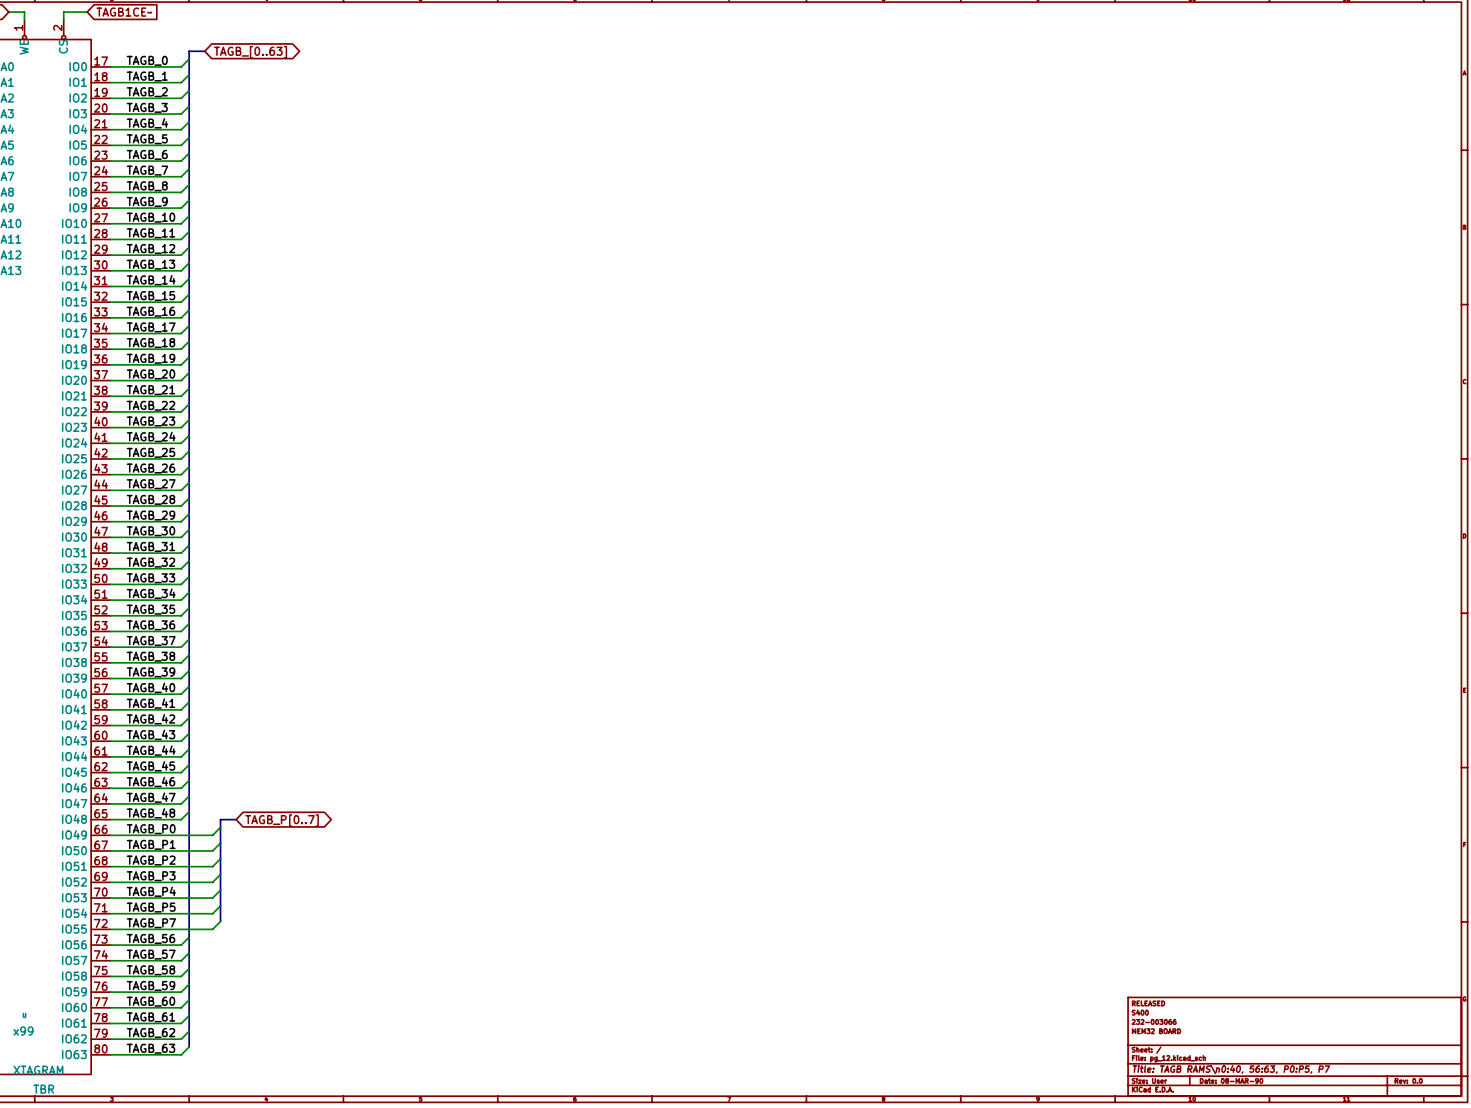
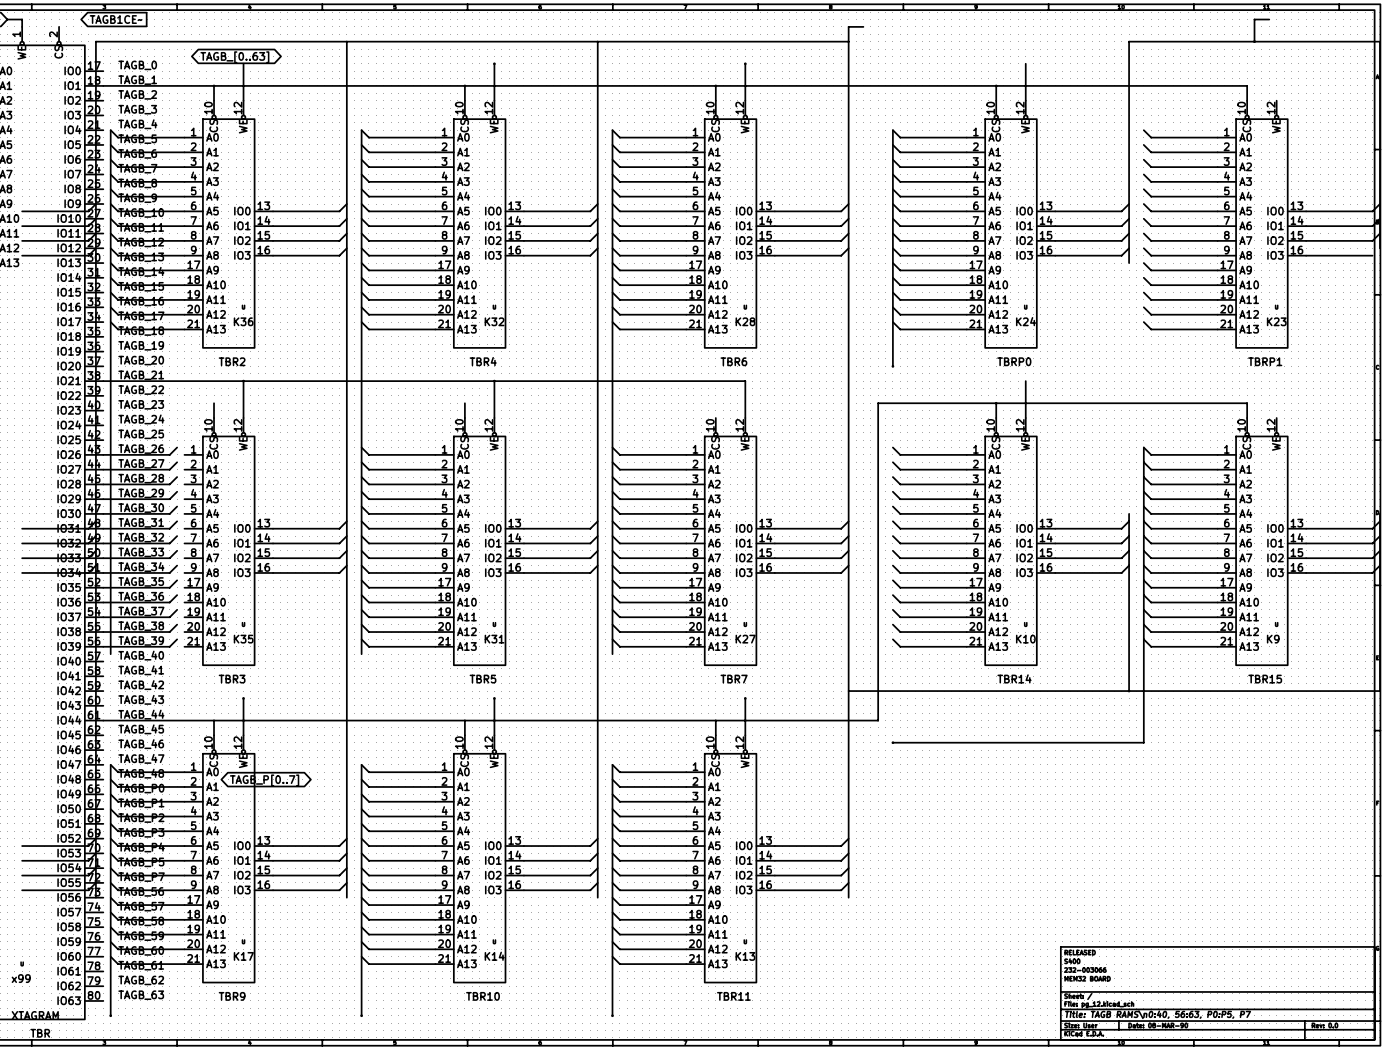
wire: (87, 12) (63, 12) (63, 19) -> none
bus: none -> (1269, 19) (1254, 19) (1254, 41)
bus: none -> (863, 26) (848, 26) (848, 897)
bus: none -> (346, 41) (346, 897)
bus: none -> (597, 41) (597, 897)
bus: none -> (848, 41) (95, 41) (95, 897)
bus: (204, 51) (189, 51) (189, 1047) -> none
wire: (189, 59) (181, 66) (110, 66) -> none
wire: none -> (243, 63) (243, 100)
wire: none -> (494, 63) (494, 100)
junction: none -> (494, 63)
wire: none -> (745, 63) (745, 100)
junction: none -> (745, 63)
wire: none -> (1025, 63) (1025, 100)
wire: (189, 74) (181, 82) -> (1247, 100) (1247, 85) (169, 85)
wire: none -> (214, 85) (214, 100)
wire: none -> (464, 85) (464, 100)
wire: none -> (715, 85) (715, 100)
wire: none -> (996, 85) (996, 100)
wire: (189, 90) (181, 98) (110, 98) -> none
wire: (189, 106) (181, 114) (110, 114) -> none
wire: (189, 121) (181, 129) (110, 129) -> none
wire: none -> (110, 130) (118, 137) (184, 137)
bus: none -> (110, 130) (110, 654)
wire: none -> (361, 130) (368, 137) (435, 137)
bus: none -> (361, 130) (361, 654)
wire: none -> (612, 130) (619, 137) (686, 137)
bus: none -> (612, 130) (612, 654)
wire: none -> (892, 130) (900, 137) (966, 137)
bus: none -> (892, 130) (892, 366)
wire: none -> (1143, 130) (1151, 137) (1217, 137)
wire: (189, 137) (181, 145) (110, 145) -> none
wire: none -> (110, 144) (118, 152) (184, 152)
wire: none -> (361, 144) (368, 152) (435, 152)
wire: none -> (612, 144) (619, 152) (686, 152)
wire: none -> (892, 144) (900, 152) (966, 152)
wire: none -> (1143, 144) (1151, 152) (1217, 152)
wire: (189, 153) (181, 161) (110, 161) -> none
wire: none -> (110, 159) (118, 167) (184, 167)
wire: none -> (361, 159) (368, 167) (435, 167)
wire: none -> (612, 159) (619, 167) (686, 167)
wire: none -> (892, 159) (900, 167) (966, 167)
wire: none -> (1143, 159) (1151, 167) (1217, 167)
wire: (189, 168) (181, 176) (110, 176) -> none
wire: none -> (110, 174) (118, 181) (184, 181)
wire: none -> (361, 174) (368, 181) (435, 181)
wire: none -> (612, 174) (619, 181) (686, 181)
wire: none -> (892, 174) (900, 181) (966, 181)
wire: none -> (1143, 174) (1151, 181) (1217, 181)
wire: (189, 184) (181, 192) (110, 192) -> none
wire: none -> (110, 189) (118, 196) (184, 196)
wire: none -> (361, 189) (368, 196) (435, 196)
wire: none -> (612, 189) (619, 196) (686, 196)
wire: none -> (892, 189) (900, 196) (966, 196)
wire: none -> (1143, 189) (1151, 196) (1217, 196)
wire: (189, 200) (181, 208) (110, 208) -> none
wire: none -> (95, 204) (88, 211) (22, 211)
wire: none -> (110, 204) (118, 211) (184, 211)
wire: none -> (346, 204) (339, 211) (273, 211)
wire: none -> (361, 204) (368, 211) (435, 211)
wire: none -> (597, 204) (590, 211) (523, 211)
wire: none -> (612, 204) (619, 211) (686, 211)
wire: none -> (848, 204) (841, 211) (774, 211)
wire: none -> (892, 204) (900, 211) (966, 211)
wire: none -> (1129, 204) (1121, 211) (1055, 211)
wire: none -> (1143, 204) (1151, 211) (1217, 211)
wire: none -> (1379, 204) (1372, 211) (1306, 211)
wire: (189, 215) (181, 223) (110, 223) -> none
wire: none -> (95, 218) (88, 226) (22, 226)
wire: none -> (110, 218) (118, 226) (184, 226)
wire: none -> (346, 218) (339, 226) (273, 226)
wire: none -> (361, 218) (368, 226) (435, 226)
wire: none -> (597, 218) (590, 226) (523, 226)
wire: none -> (612, 218) (619, 226) (686, 226)
wire: none -> (848, 218) (841, 226) (774, 226)
wire: none -> (892, 218) (900, 226) (966, 226)
wire: none -> (1129, 218) (1121, 226) (1055, 226)
wire: none -> (1143, 218) (1151, 226) (1217, 226)
wire: none -> (1379, 218) (1372, 226) (1306, 226)
part: none -> (228, 224)
part: none -> (479, 224)
part: none -> (730, 224)
part: none -> (1010, 224)
part: none -> (1261, 224)
wire: (189, 231) (181, 239) (110, 239) -> none
wire: none -> (95, 233) (88, 240) (22, 240)
wire: none -> (110, 233) (118, 240) (184, 240)
wire: none -> (346, 233) (339, 240) (273, 240)
wire: none -> (361, 233) (368, 240) (435, 240)
wire: none -> (597, 233) (590, 240) (523, 240)
wire: none -> (612, 233) (619, 240) (686, 240)
wire: none -> (848, 233) (841, 240) (774, 240)
wire: none -> (892, 233) (900, 240) (966, 240)
wire: none -> (1129, 233) (1121, 240) (1055, 240)
wire: none -> (1143, 233) (1151, 240) (1217, 240)
wire: none -> (1379, 233) (1372, 240) (1306, 240)
wire: (189, 247) (181, 255) (110, 255) -> none
wire: none -> (95, 248) (88, 255) (22, 255)
wire: none -> (110, 248) (118, 255) (184, 255)
wire: none -> (346, 248) (339, 255) (273, 255)
wire: none -> (361, 248) (368, 255) (435, 255)
wire: none -> (597, 248) (590, 255) (523, 255)
wire: none -> (612, 248) (619, 255) (686, 255)
wire: none -> (848, 248) (841, 255) (774, 255)
wire: none -> (892, 248) (900, 255) (966, 255)
wire: none -> (1129, 248) (1121, 255) (1055, 255)
wire: none -> (1143, 248) (1151, 255) (1217, 255)
bus: none -> (1379, 248) (1379, 41) (1129, 41) (1129, 263)
wire: (189, 262) (181, 270) (110, 270) -> none
wire: none -> (1306, 255) (1372, 255)
wire: none -> (110, 263) (118, 270) (184, 270)
wire: none -> (361, 263) (368, 270) (435, 270)
wire: none -> (612, 263) (619, 270) (686, 270)
wire: none -> (892, 263) (900, 270) (966, 270)
wire: none -> (1143, 263) (1151, 270) (1217, 270)
wire: (189, 278) (181, 286) (110, 286) -> none
wire: none -> (110, 277) (118, 285) (184, 285)
wire: none -> (361, 277) (368, 285) (435, 285)
wire: none -> (612, 277) (619, 285) (686, 285)
wire: none -> (892, 277) (900, 285) (966, 285)
wire: none -> (1143, 277) (1151, 285) (1217, 285)
wire: (189, 294) (181, 302) (110, 302) -> none
wire: none -> (110, 292) (118, 299) (184, 299)
wire: none -> (361, 292) (368, 299) (435, 299)
wire: none -> (612, 292) (619, 299) (686, 299)
wire: none -> (892, 292) (900, 299) (966, 299)
wire: none -> (1143, 292) (1151, 299) (1217, 299)
wire: (189, 310) (181, 317) (110, 317) -> none
wire: none -> (110, 307) (118, 314) (184, 314)
wire: none -> (361, 307) (368, 314) (435, 314)
wire: none -> (612, 307) (619, 314) (686, 314)
wire: none -> (892, 307) (900, 314) (966, 314)
wire: none -> (1143, 307) (1151, 314) (1217, 314)
wire: (189, 325) (181, 333) (110, 333) -> none
wire: none -> (110, 322) (118, 329) (184, 329)
wire: none -> (361, 322) (368, 329) (435, 329)
wire: none -> (612, 322) (619, 329) (686, 329)
wire: none -> (892, 322) (900, 329) (966, 329)
wire: none -> (1143, 322) (1151, 329) (1217, 329)
wire: (189, 341) (181, 349) (110, 349) -> none
wire: (189, 357) (181, 364) (110, 364) -> none
wire: (189, 372) (181, 380) (110, 380) -> none
junction: none -> (892, 366)
wire: (189, 388) (181, 396) -> (745, 418) (745, 381) (169, 381)
wire: none -> (243, 381) (243, 418)
wire: none -> (494, 381) (494, 418)
wire: none -> (1025, 381) (1025, 418)
wire: (189, 404) (181, 411) (110, 411) -> none
wire: (189, 419) (181, 427) (110, 427) -> none
wire: none -> (214, 403) (214, 418)
wire: none -> (464, 403) (464, 418)
wire: none -> (996, 403) (996, 418)
wire: (189, 435) (181, 443) (110, 443) -> none
wire: (189, 451) (181, 458) (110, 458) -> none
wire: none -> (361, 447) (368, 454) (435, 454)
wire: none -> (612, 447) (619, 454) (686, 454)
wire: none -> (892, 447) (900, 454) (966, 454)
wire: none -> (1143, 447) (1151, 454) (1217, 454)
bus: none -> (1143, 447) (1143, 742) (892, 742)
wire: none -> (361, 462) (368, 469) (435, 469)
wire: none -> (612, 462) (619, 469) (686, 469)
wire: none -> (892, 462) (900, 469) (966, 469)
wire: none -> (1143, 462) (1151, 469) (1217, 469)
wire: none -> (361, 477) (368, 484) (435, 484)
wire: none -> (612, 477) (619, 484) (686, 484)
wire: none -> (892, 477) (900, 484) (966, 484)
wire: none -> (1143, 477) (1151, 484) (1217, 484)
wire: none -> (361, 491) (368, 499) (435, 499)
wire: none -> (612, 491) (619, 499) (686, 499)
wire: none -> (892, 491) (900, 499) (966, 499)
wire: none -> (1143, 491) (1151, 499) (1217, 499)
wire: none -> (361, 506) (368, 513) (435, 513)
wire: none -> (612, 506) (619, 513) (686, 513)
wire: none -> (892, 506) (900, 513) (966, 513)
wire: none -> (1143, 506) (1151, 513) (1217, 513)
bus: none -> (1129, 513) (1129, 691)
bus: none -> (1379, 513) (1379, 691) (848, 691)
wire: none -> (95, 521) (88, 528) (22, 528)
wire: none -> (346, 521) (339, 528) (273, 528)
wire: none -> (361, 521) (368, 528) (435, 528)
wire: none -> (597, 521) (590, 528) (523, 528)
wire: none -> (612, 521) (619, 528) (686, 528)
wire: none -> (848, 521) (841, 528) (774, 528)
wire: none -> (892, 521) (900, 528) (966, 528)
wire: none -> (1129, 521) (1121, 528) (1055, 528)
wire: none -> (1143, 521) (1151, 528) (1217, 528)
wire: none -> (1379, 521) (1372, 528) (1306, 528)
wire: none -> (95, 536) (88, 543) (22, 543)
wire: none -> (346, 536) (339, 543) (273, 543)
wire: none -> (361, 536) (368, 543) (435, 543)
wire: none -> (597, 536) (590, 543) (523, 543)
wire: none -> (612, 536) (619, 543) (686, 543)
wire: none -> (848, 536) (841, 543) (774, 543)
wire: none -> (892, 536) (900, 543) (966, 543)
wire: none -> (1129, 536) (1121, 543) (1055, 543)
wire: none -> (1143, 536) (1151, 543) (1217, 543)
wire: none -> (1379, 536) (1372, 543) (1306, 543)
part: none -> (228, 541)
part: none -> (479, 541)
part: none -> (730, 541)
part: none -> (1010, 541)
part: none -> (1261, 541)
wire: none -> (95, 550) (88, 558) (22, 558)
wire: none -> (346, 550) (339, 558) (273, 558)
wire: none -> (361, 550) (368, 558) (435, 558)
wire: none -> (597, 550) (590, 558) (523, 558)
wire: none -> (612, 550) (619, 558) (686, 558)
wire: none -> (848, 550) (841, 558) (774, 558)
wire: none -> (892, 550) (900, 558) (966, 558)
wire: none -> (1129, 550) (1121, 558) (1055, 558)
wire: none -> (1143, 550) (1151, 558) (1217, 558)
wire: none -> (1379, 550) (1372, 558) (1306, 558)
wire: none -> (95, 565) (88, 572) (22, 572)
wire: none -> (346, 565) (339, 572) (273, 572)
wire: none -> (361, 565) (368, 572) (435, 572)
wire: none -> (597, 565) (590, 572) (523, 572)
wire: none -> (612, 565) (619, 572) (686, 572)
wire: none -> (848, 565) (841, 572) (774, 572)
wire: none -> (892, 565) (900, 572) (966, 572)
wire: none -> (1129, 565) (1121, 572) (1055, 572)
wire: none -> (1143, 565) (1151, 572) (1217, 572)
wire: none -> (1379, 565) (1372, 572) (1306, 572)
wire: none -> (361, 580) (368, 587) (435, 587)
wire: none -> (612, 580) (619, 587) (686, 587)
wire: none -> (892, 580) (900, 587) (966, 587)
wire: none -> (1143, 580) (1151, 587) (1217, 587)
wire: none -> (361, 595) (368, 602) (435, 602)
wire: none -> (612, 595) (619, 602) (686, 602)
wire: none -> (892, 595) (900, 602) (966, 602)
wire: none -> (1143, 595) (1151, 602) (1217, 602)
wire: none -> (361, 609) (368, 617) (435, 617)
wire: none -> (612, 609) (619, 617) (686, 617)
wire: none -> (892, 609) (900, 617) (966, 617)
wire: none -> (1143, 609) (1151, 617) (1217, 617)
wire: none -> (361, 624) (368, 632) (435, 632)
wire: none -> (612, 624) (619, 632) (686, 632)
wire: none -> (892, 624) (900, 632) (966, 632)
wire: none -> (1143, 624) (1151, 632) (1217, 632)
wire: none -> (361, 639) (368, 646) (435, 646)
wire: none -> (612, 639) (619, 646) (686, 646)
wire: none -> (892, 639) (900, 646) (966, 646)
wire: none -> (1143, 639) (1151, 646) (1217, 646)
wire: (189, 686) (181, 694) (110, 694) -> none
wire: (189, 702) (181, 709) (110, 709) -> none
wire: (189, 717) (181, 725) (110, 725) -> none
wire: (189, 733) (181, 741) (110, 741) -> none
wire: none -> (243, 698) (243, 735)
junction: none -> (243, 698)
wire: none -> (494, 698) (494, 735)
junction: none -> (494, 698)
wire: none -> (745, 698) (745, 735)
junction: none -> (745, 698)
wire: (189, 749) (181, 756) -> (1247, 418) (1247, 403) (878, 403) (878, 720) (169, 720)
wire: none -> (214, 720) (214, 735)
wire: none -> (464, 720) (464, 735)
wire: none -> (715, 720) (715, 735)
wire: (189, 764) (181, 772) (110, 772) -> none
wire: (189, 780) (181, 788) (110, 788) -> none
junction: none -> (892, 742)
wire: (189, 796) (181, 803) (110, 803) -> none
wire: none -> (110, 764) (118, 772) (184, 772)
bus: none -> (110, 764) (110, 1015)
wire: none -> (361, 764) (368, 772) (435, 772)
bus: none -> (361, 764) (361, 1015)
wire: none -> (612, 764) (619, 772) (686, 772)
bus: none -> (612, 764) (612, 1015)
wire: (189, 811) (181, 819) (110, 819) -> none
wire: none -> (110, 779) (118, 786) (184, 786)
bus: (236, 819) (220, 819) (220, 921) -> none
wire: none -> (361, 779) (368, 786) (435, 786)
wire: none -> (612, 779) (619, 786) (686, 786)
wire: (220, 827) (212, 835) (110, 835) -> none
wire: none -> (110, 794) (118, 801) (184, 801)
wire: none -> (361, 794) (368, 801) (435, 801)
wire: none -> (612, 794) (619, 801) (686, 801)
wire: (220, 843) (212, 850) (110, 850) -> none
wire: none -> (110, 809) (118, 816) (184, 816)
wire: none -> (361, 809) (368, 816) (435, 816)
wire: none -> (612, 809) (619, 816) (686, 816)
wire: (220, 858) (212, 866) (110, 866) -> none
wire: none -> (110, 823) (118, 831) (184, 831)
wire: none -> (361, 823) (368, 831) (435, 831)
wire: none -> (612, 823) (619, 831) (686, 831)
wire: (220, 874) (212, 882) (110, 882) -> none
wire: none -> (95, 838) (88, 846) (22, 846)
wire: none -> (110, 838) (118, 846) (184, 846)
wire: none -> (346, 838) (339, 846) (273, 846)
wire: none -> (361, 838) (368, 846) (435, 846)
wire: none -> (597, 838) (590, 846) (523, 846)
wire: none -> (612, 838) (619, 846) (686, 846)
wire: none -> (848, 838) (841, 846) (774, 846)
wire: (220, 890) (212, 898) (110, 898) -> none
wire: none -> (95, 853) (88, 860) (22, 860)
wire: none -> (110, 853) (118, 860) (184, 860)
wire: none -> (346, 853) (339, 860) (273, 860)
wire: none -> (361, 853) (368, 860) (435, 860)
wire: none -> (597, 853) (590, 860) (523, 860)
wire: none -> (612, 853) (619, 860) (686, 860)
wire: none -> (848, 853) (841, 860) (774, 860)
part: none -> (228, 858)
part: none -> (479, 858)
part: none -> (730, 858)
wire: (220, 905) (212, 913) (110, 913) -> none
wire: none -> (95, 868) (88, 875) (22, 875)
wire: none -> (110, 868) (118, 875) (184, 875)
wire: none -> (346, 868) (339, 875) (273, 875)
wire: none -> (361, 868) (368, 875) (435, 875)
wire: none -> (597, 868) (590, 875) (523, 875)
wire: none -> (612, 868) (619, 875) (686, 875)
wire: none -> (848, 868) (841, 875) (774, 875)
wire: (220, 921) (212, 929) (110, 929) -> none
wire: none -> (95, 882) (88, 890) (22, 890)
wire: none -> (110, 882) (118, 890) (184, 890)
wire: none -> (346, 882) (339, 890) (273, 890)
wire: none -> (361, 882) (368, 890) (435, 890)
wire: none -> (597, 882) (590, 890) (523, 890)
wire: none -> (612, 882) (619, 890) (686, 890)
wire: none -> (848, 882) (841, 890) (774, 890)
wire: (189, 937) (181, 945) (110, 945) -> none
wire: none -> (110, 897) (118, 905) (184, 905)
wire: none -> (361, 897) (368, 905) (435, 905)
wire: none -> (612, 897) (619, 905) (686, 905)
wire: (189, 952) (181, 960) (110, 960) -> none
wire: none -> (110, 912) (118, 919) (184, 919)
wire: none -> (361, 912) (368, 919) (435, 919)
wire: none -> (612, 912) (619, 919) (686, 919)
wire: (189, 968) (181, 976) (110, 976) -> none
wire: none -> (110, 927) (118, 934) (184, 934)
wire: none -> (361, 927) (368, 934) (435, 934)
wire: none -> (612, 927) (619, 934) (686, 934)
wire: (189, 984) (181, 992) (110, 992) -> none
wire: none -> (110, 941) (118, 949) (184, 949)
wire: none -> (361, 941) (368, 949) (435, 949)
wire: none -> (612, 941) (619, 949) (686, 949)
wire: (189, 999) (181, 1007) (110, 1007) -> none
wire: none -> (110, 956) (118, 964) (184, 964)
wire: none -> (361, 956) (368, 964) (435, 964)
wire: none -> (612, 956) (619, 964) (686, 964)
wire: (189, 1015) (181, 1023) (110, 1023) -> none
wire: (189, 1031) (181, 1039) (110, 1039) -> none
wire: (189, 1047) (181, 1054) (110, 1054) -> none
junction: none -> (110, 1015)
junction: none -> (361, 1015)
junction: none -> (612, 1015)

